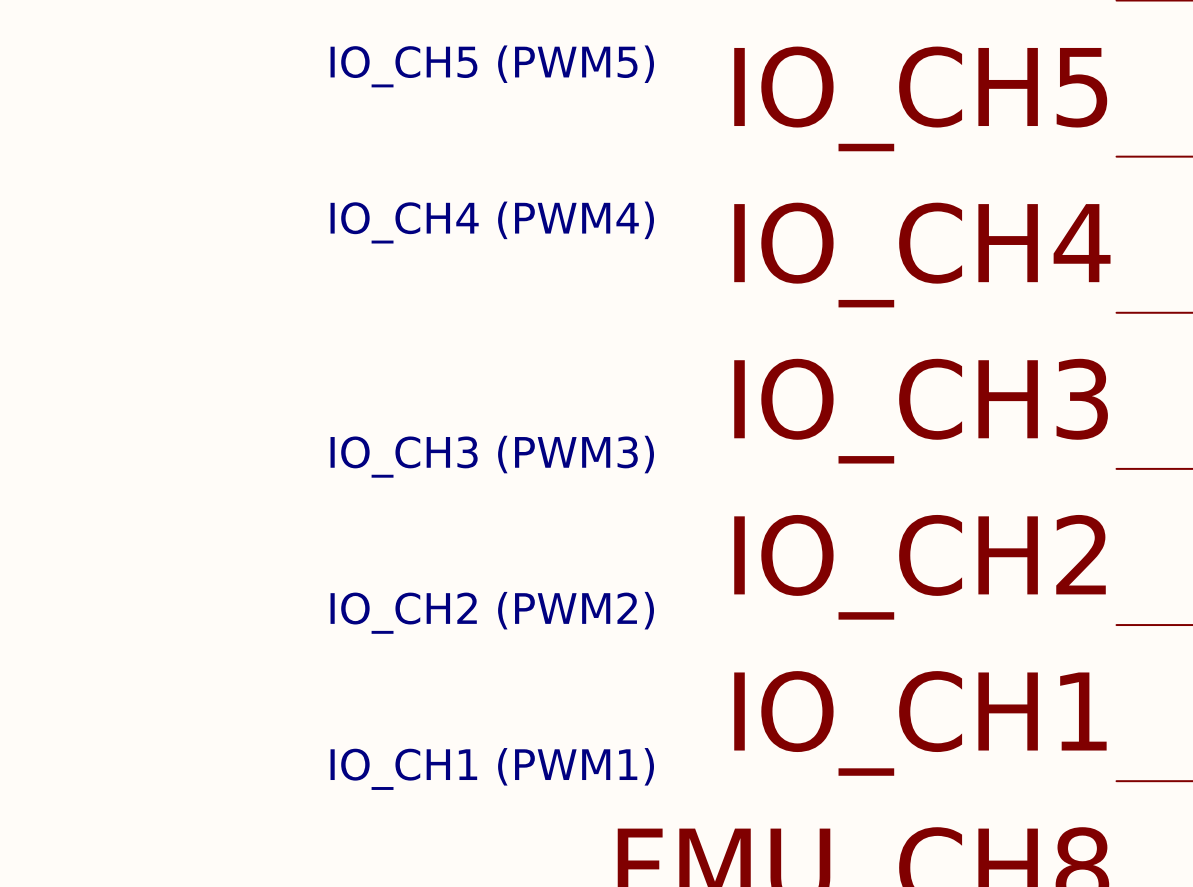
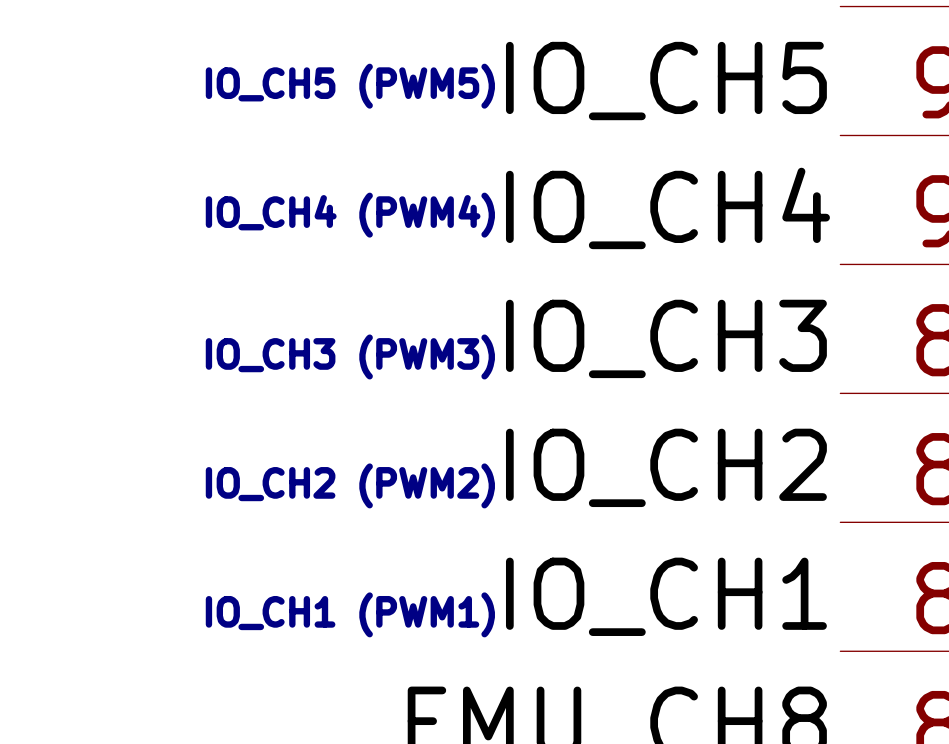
text position: IO_CH5 (PWM5) (492, 66) -> IO_CH5 (PWM5) (350, 86)
text position: IO_CH4 (PWM4) (492, 222) -> IO_CH4 (PWM4) (350, 215)
text position: IO_CH3 (PWM3) (492, 456) -> IO_CH3 (PWM3) (350, 356)
text position: IO_CH2 (PWM2) (492, 612) -> IO_CH2 (PWM2) (350, 485)
text position: IO_CH1 (PWM1) (492, 768) -> IO_CH1 (PWM1) (350, 614)

